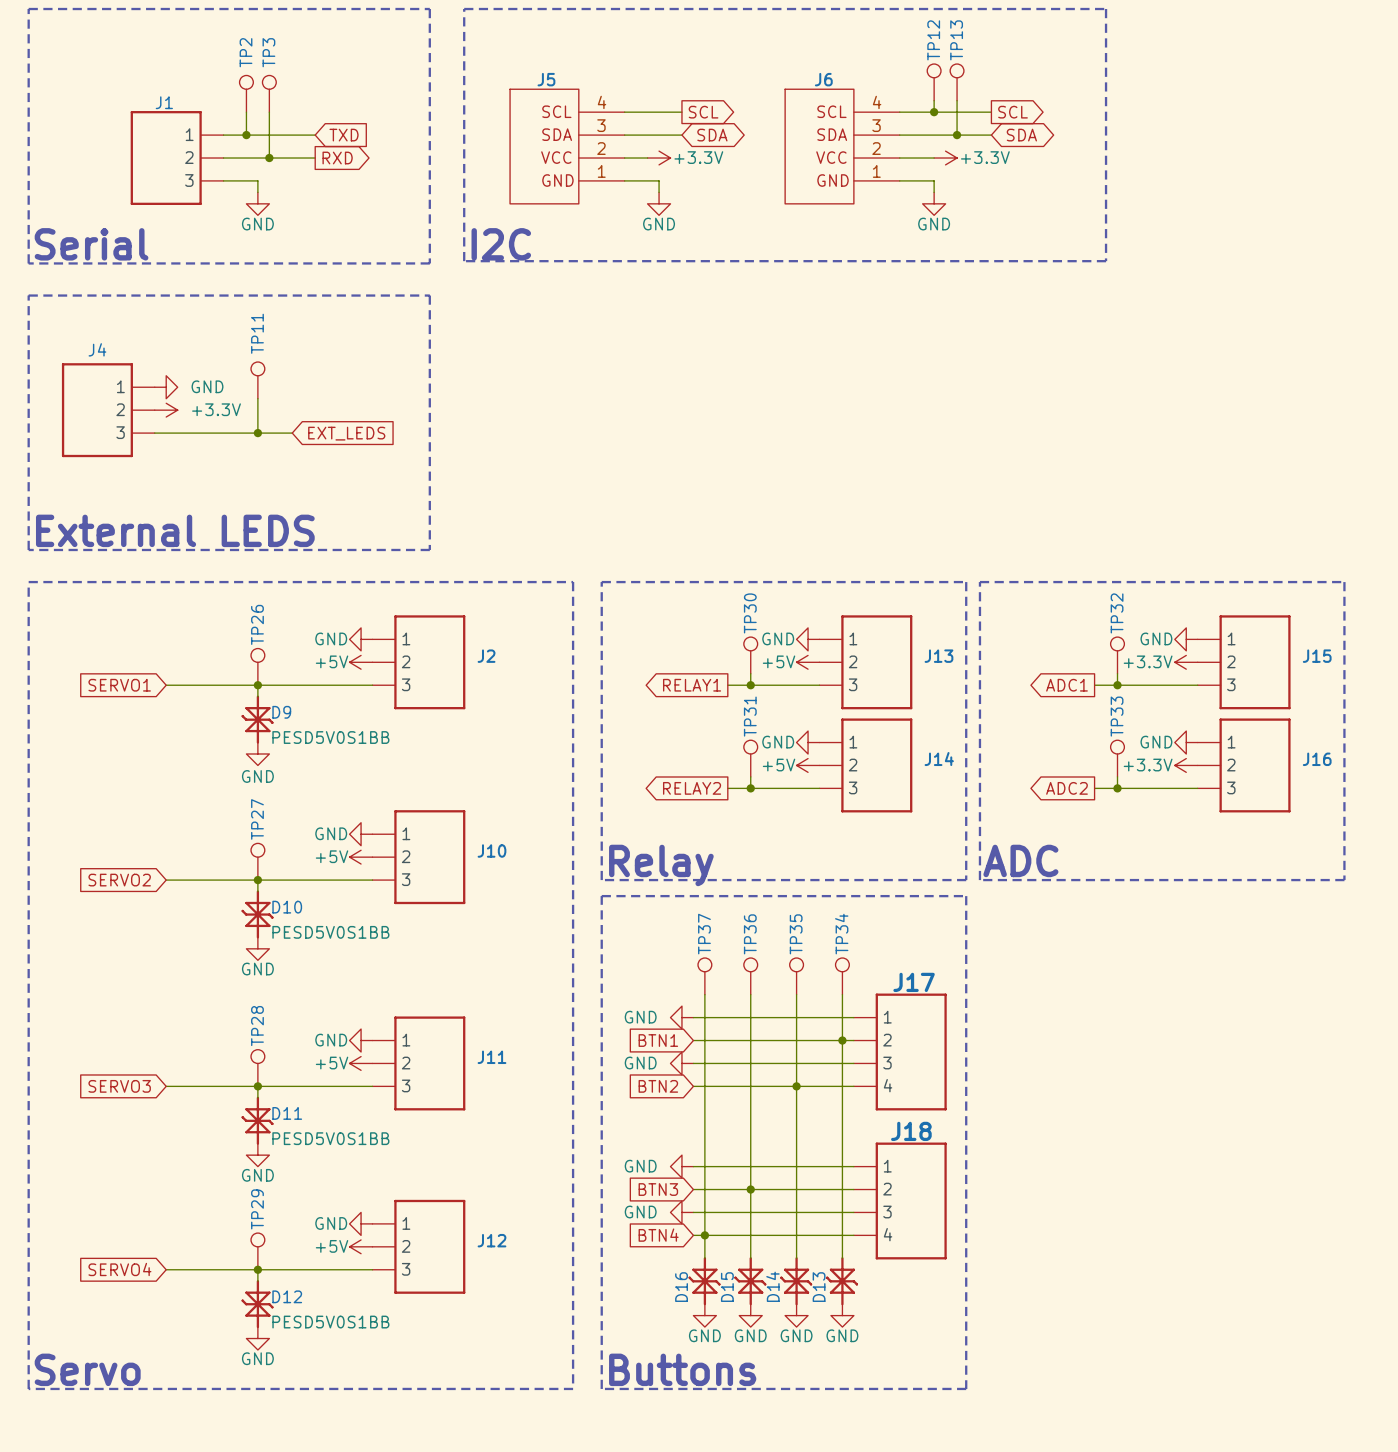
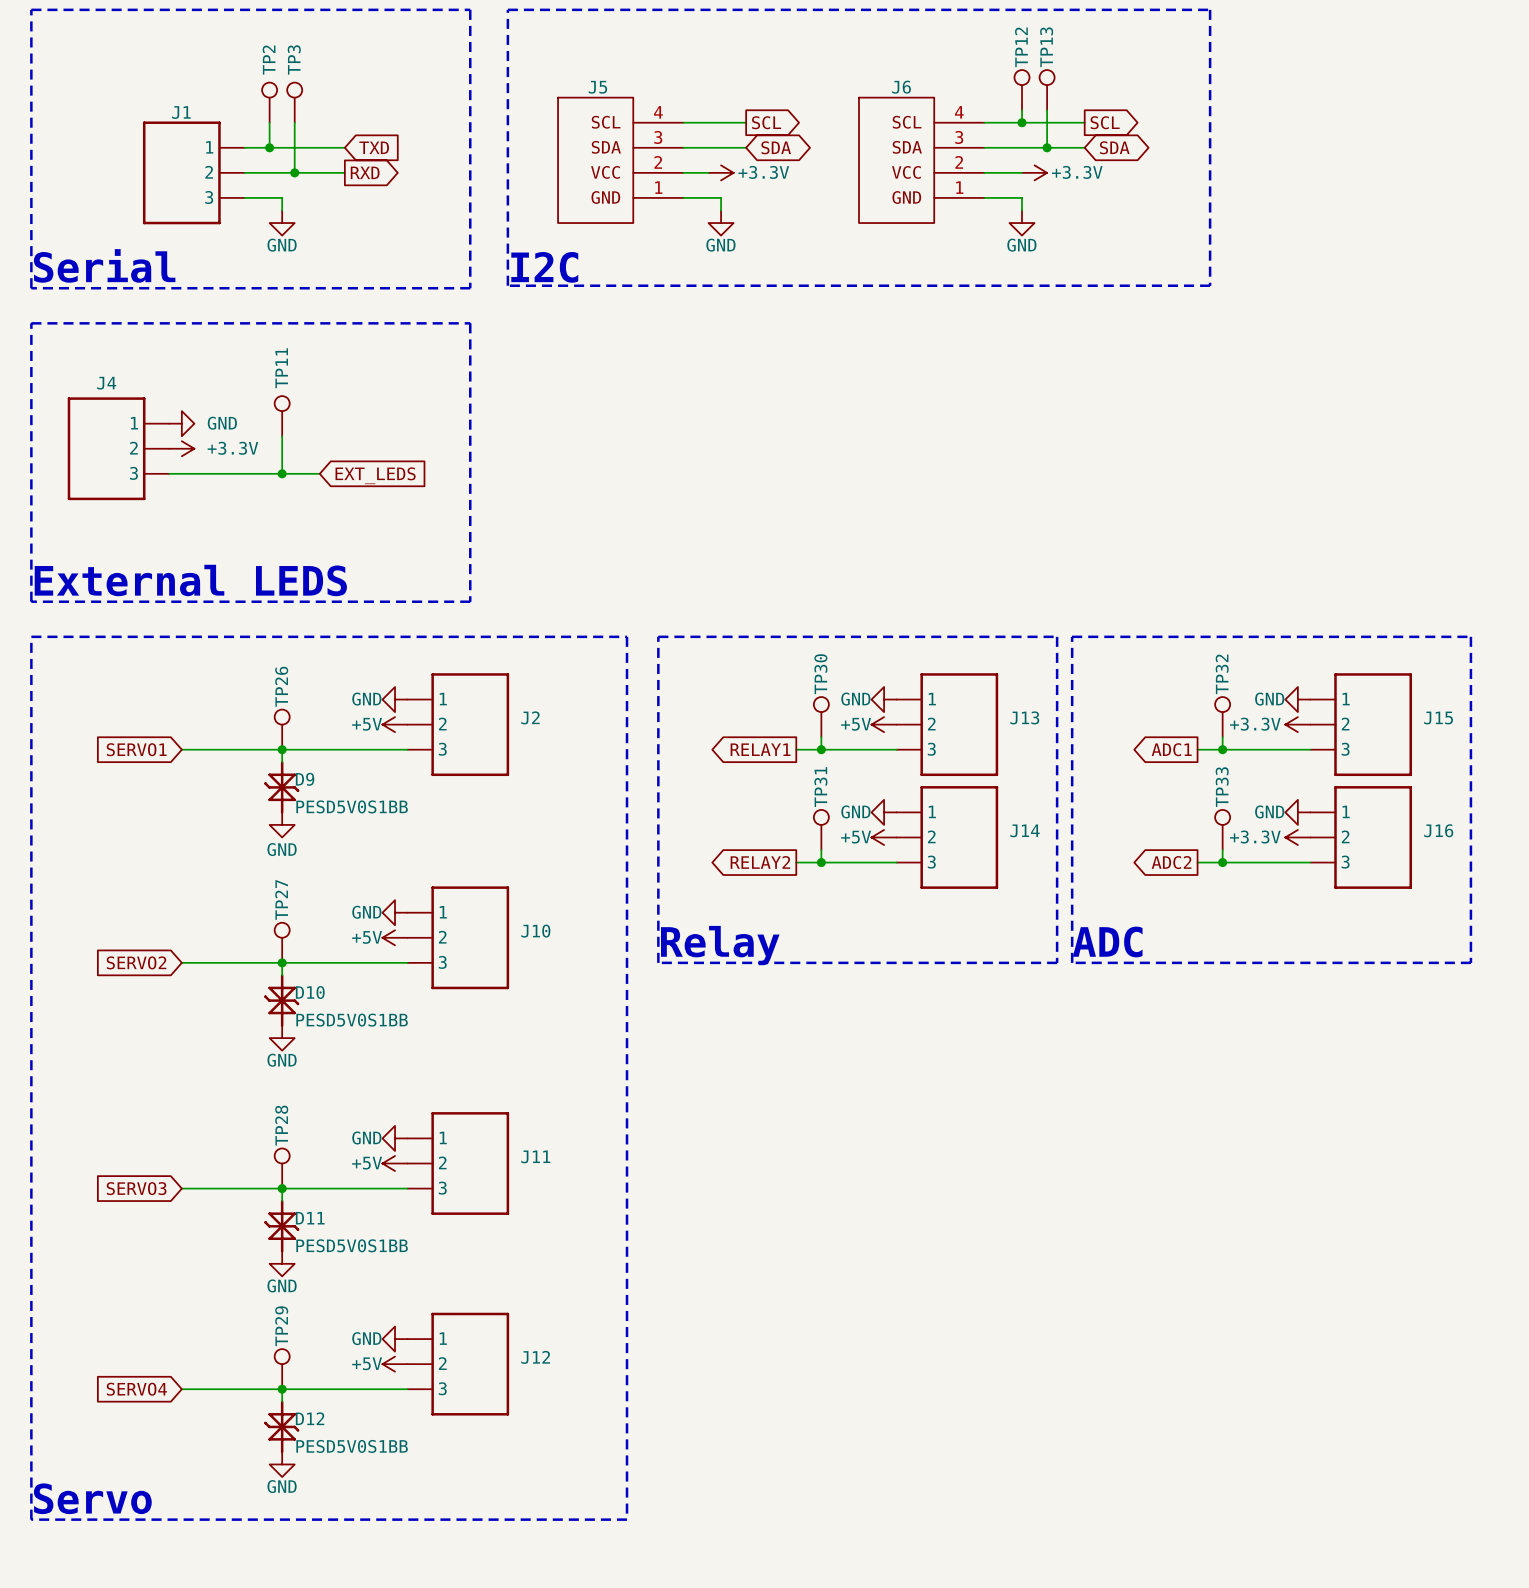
line: (601, 896) (966, 896) (966, 1388) (601, 1388) (601, 896) -> none
TP37: (704, 976) -> none
TP36: (750, 976) -> none
TP35: (796, 976) -> none
TP34: (842, 976) -> none
wire: (704, 994) (704, 1258) -> none
wire: (750, 994) (750, 1258) -> none
wire: (796, 994) (796, 1258) -> none
wire: (842, 994) (842, 1258) -> none
power symbol: GND (681, 1017) -> none
wire: (693, 1017) (853, 1017) -> none
global label: BTN1 (658, 1040) -> none
wire: (693, 1040) (853, 1040) -> none
junction: (842, 1040) -> none
J17: (900, 1051) -> none
power symbol: GND (681, 1063) -> none
wire: (693, 1063) (853, 1063) -> none
global label: BTN2 (658, 1086) -> none
wire: (693, 1086) (853, 1086) -> none
junction: (796, 1086) -> none
power symbol: GND (681, 1166) -> none
wire: (693, 1166) (853, 1166) -> none
global label: BTN3 (658, 1189) -> none
wire: (693, 1189) (853, 1189) -> none
junction: (750, 1189) -> none
J18: (900, 1200) -> none
power symbol: GND (681, 1212) -> none
wire: (693, 1212) (853, 1212) -> none
global label: BTN4 (658, 1235) -> none
wire: (693, 1235) (853, 1235) -> none
junction: (704, 1235) -> none
D16: (704, 1281) -> none
D15: (750, 1281) -> none
D14: (796, 1281) -> none
D13: (842, 1281) -> none
power symbol: GND (704, 1315) -> none
power symbol: GND (750, 1315) -> none
power symbol: GND (796, 1315) -> none
power symbol: GND (842, 1315) -> none
text: Buttons (682, 1369) -> none

